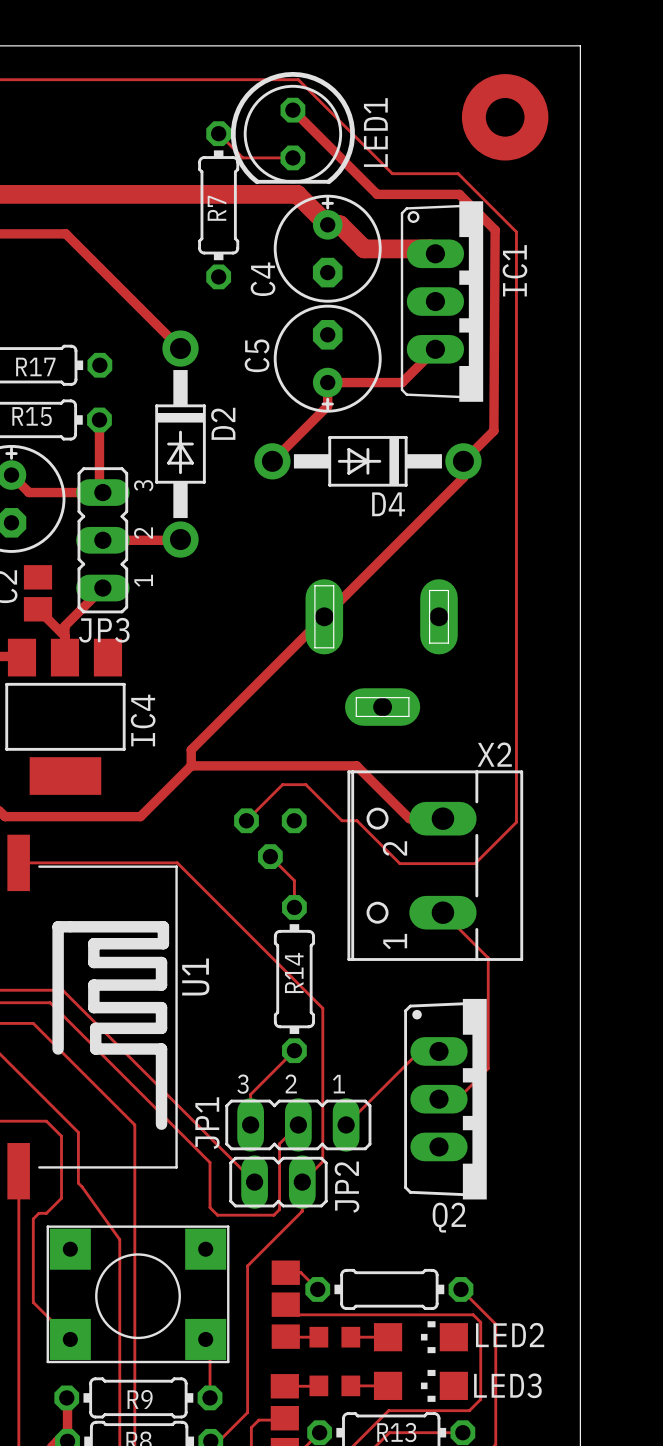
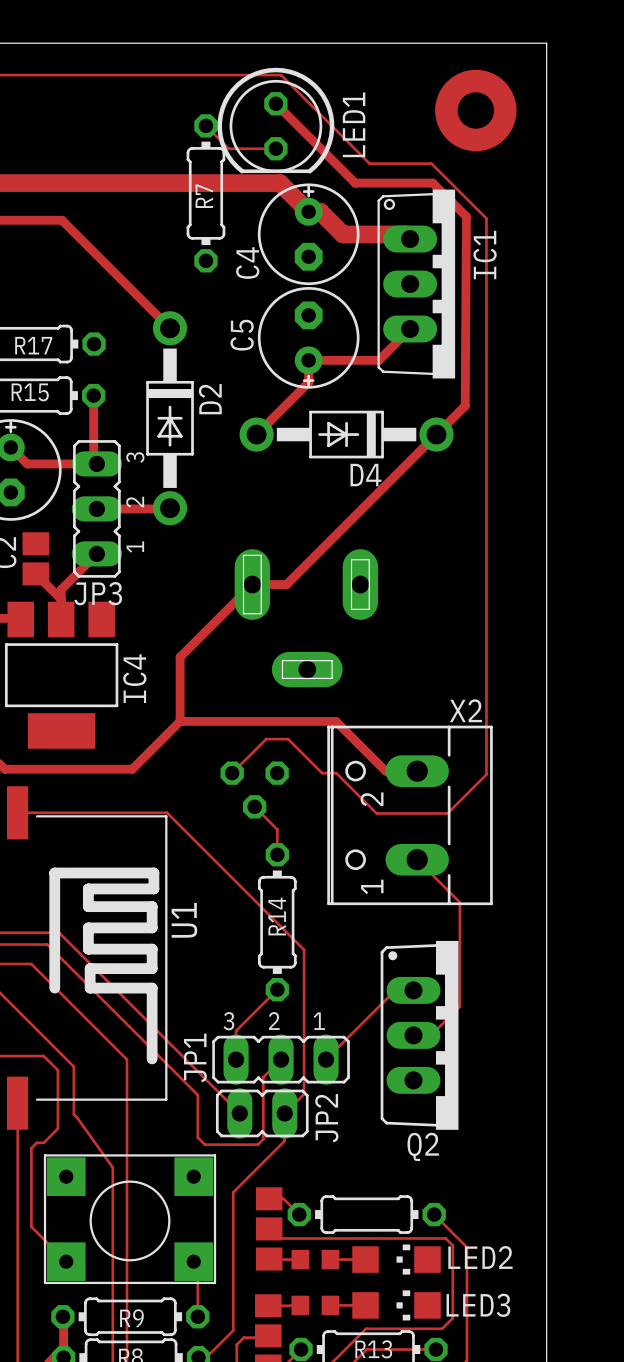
top track: (463, 461) (463, 477) (191, 749) -> (436, 434) (286, 584) (252, 584)
top track: none -> (252, 584) (180, 657) (180, 706)
part position: (381, 652) -> (306, 618)

